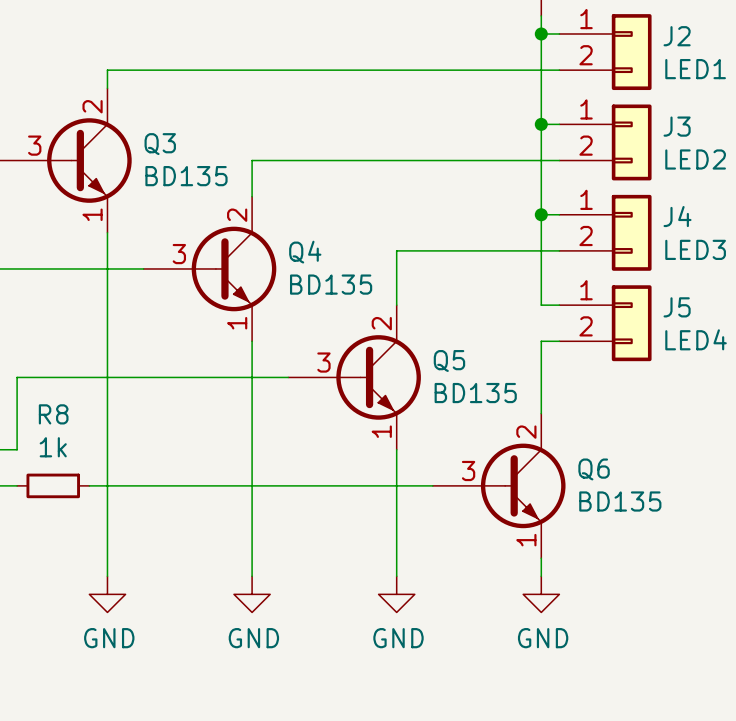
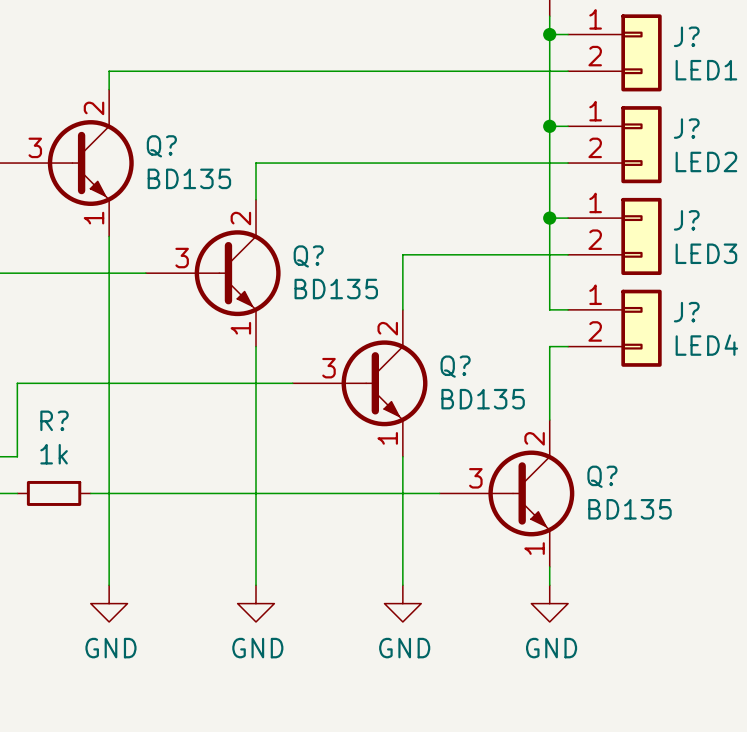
J2 name: J2 (677, 36) -> J? (686, 36)
J3 name: J3 (677, 126) -> J? (686, 128)
Q3 name: Q3 (160, 144) -> Q? (161, 146)
J4 name: J4 (677, 216) -> J? (686, 220)
Q4 name: Q4 (305, 252) -> Q? (308, 256)
J5 name: J5 (677, 307) -> J? (686, 312)
Q5 name: Q5 (449, 361) -> Q? (455, 366)
R8 name: R8 (53, 414) -> R? (54, 420)
Q6 name: Q6 (594, 469) -> Q? (602, 476)

